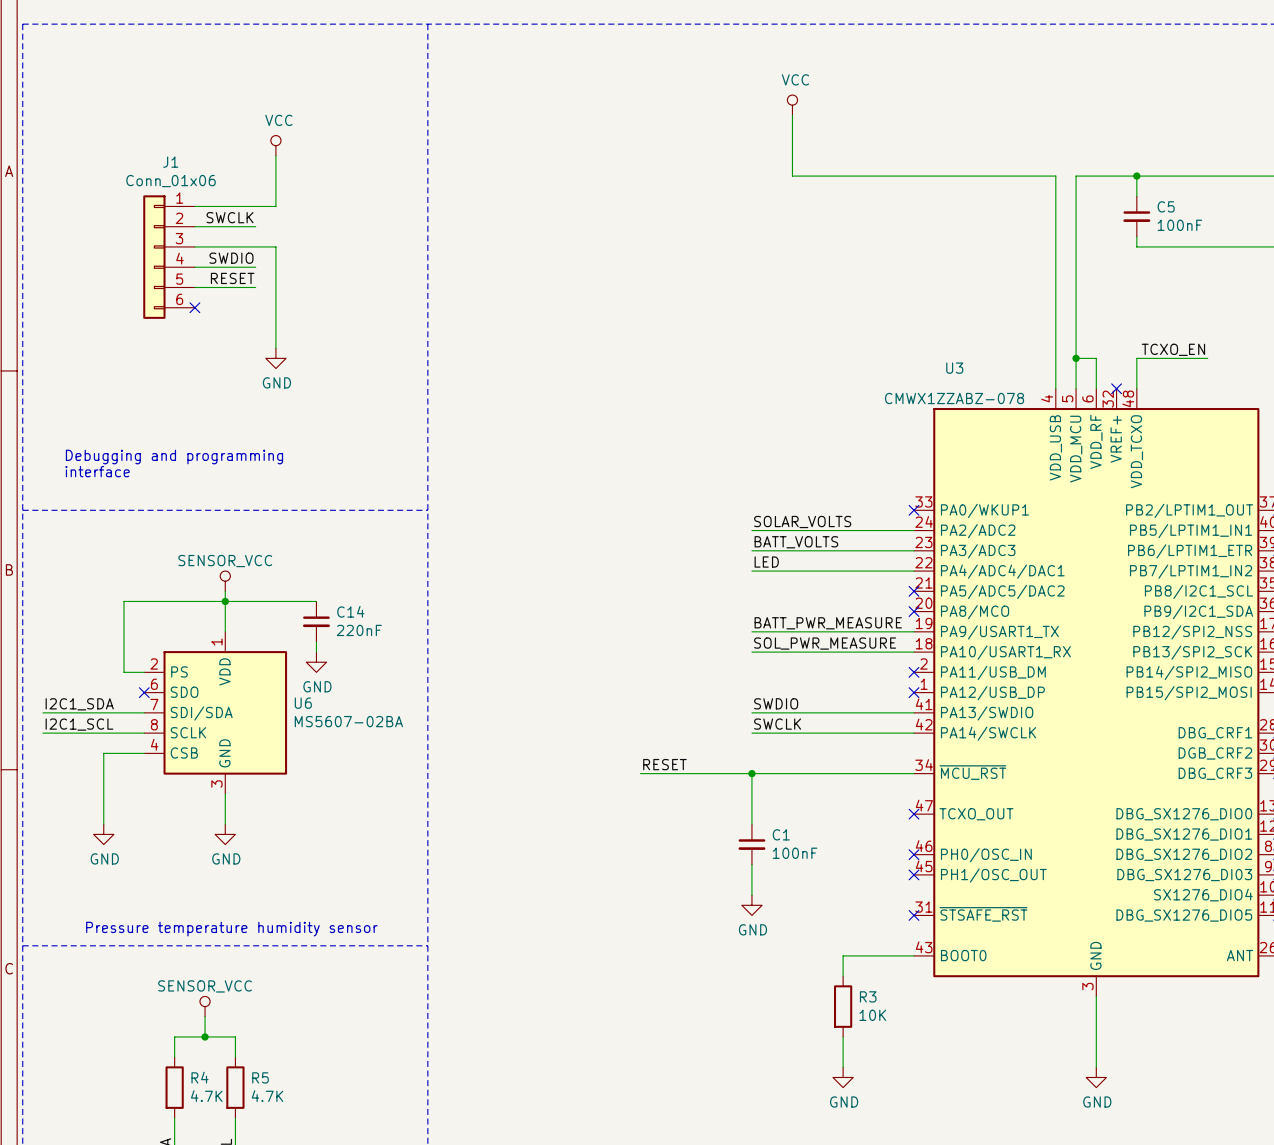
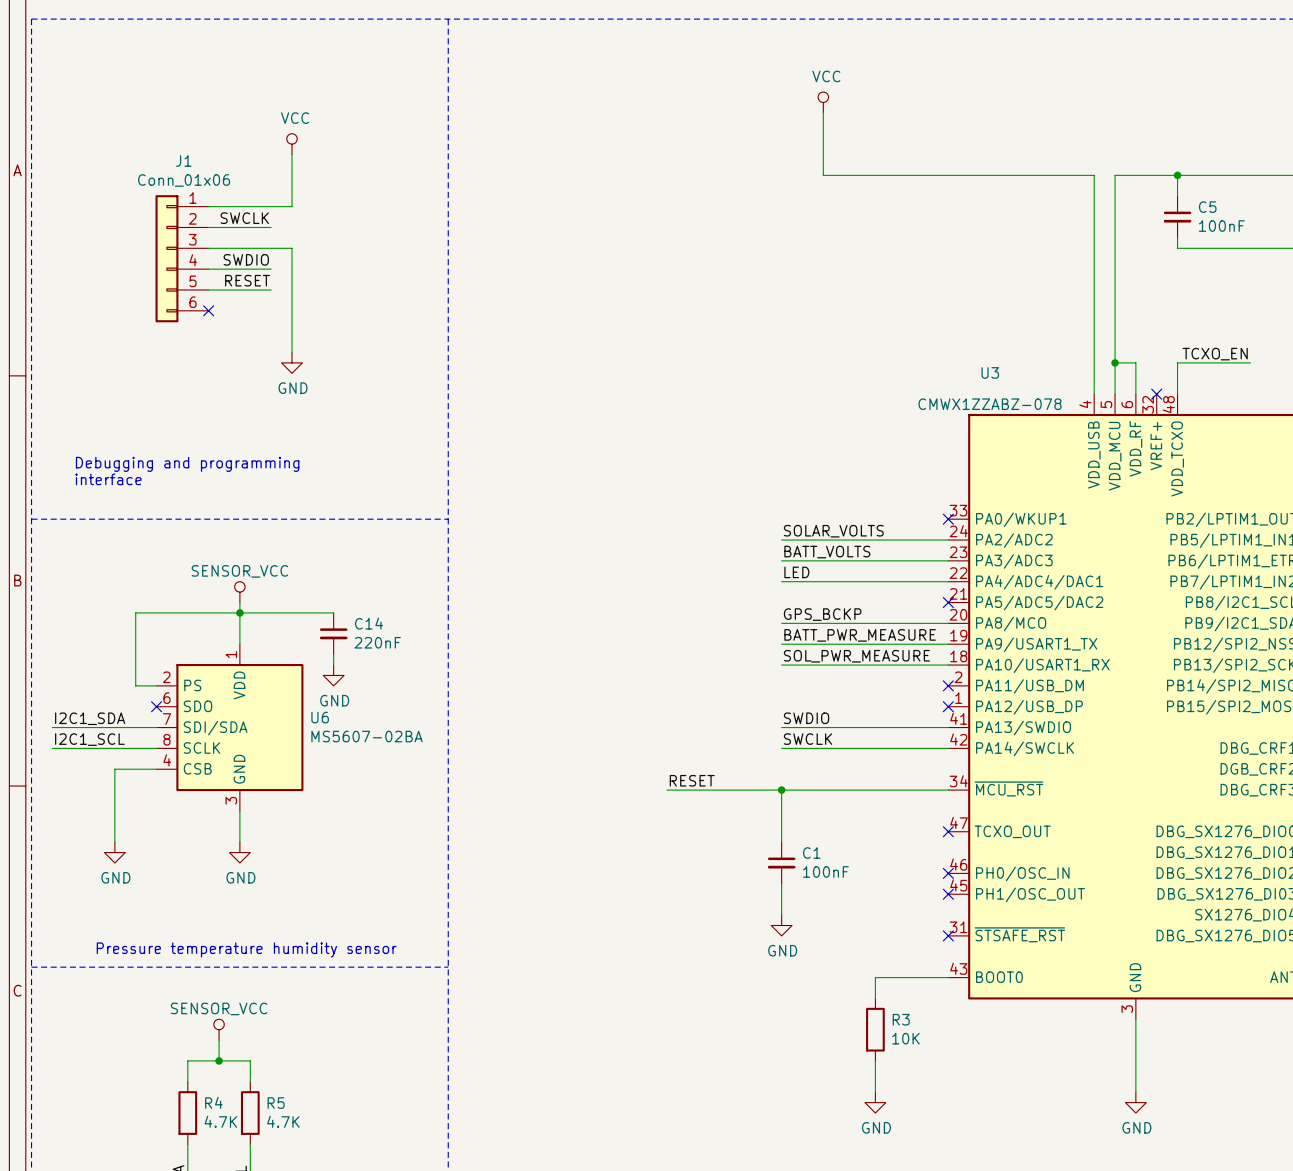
label: none -> GPS_BCKP (822, 614)
wire: none -> (781, 623) (948, 623)
no-connect mark: (914, 611) -> none

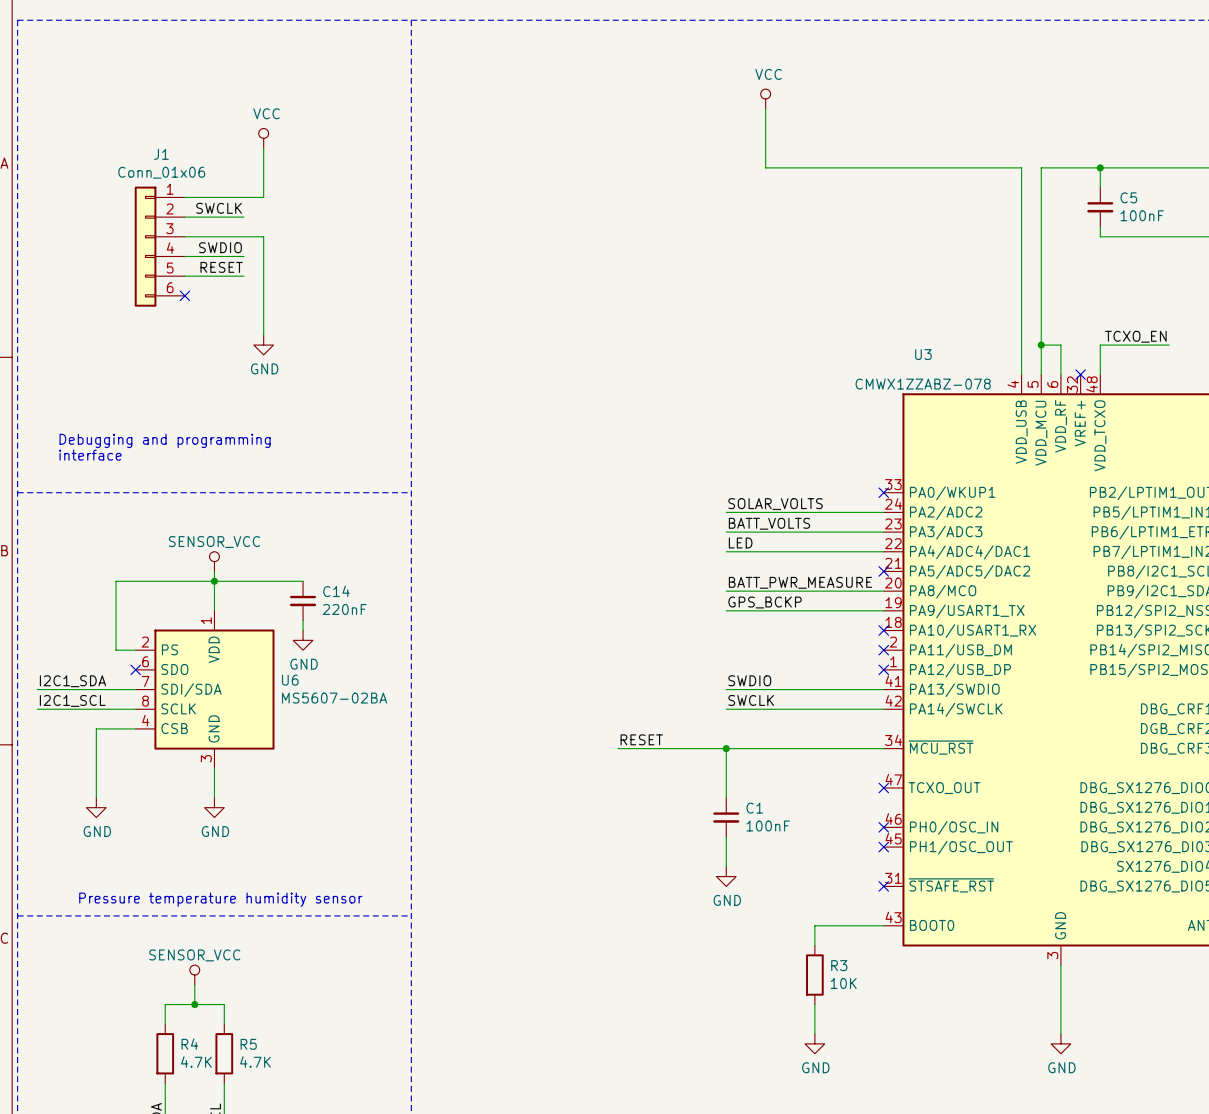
label: GPS_BCKP (822, 614) -> BATT_PWR_MEASURE (800, 582)
label: BATT_PWR_MEASURE (860, 635) -> GPS_BCKP (765, 602)
label: SOL_PWR_MEASURE (856, 656) -> none
wire: (781, 665) (948, 665) -> none
no-connect mark: none -> (883, 630)

